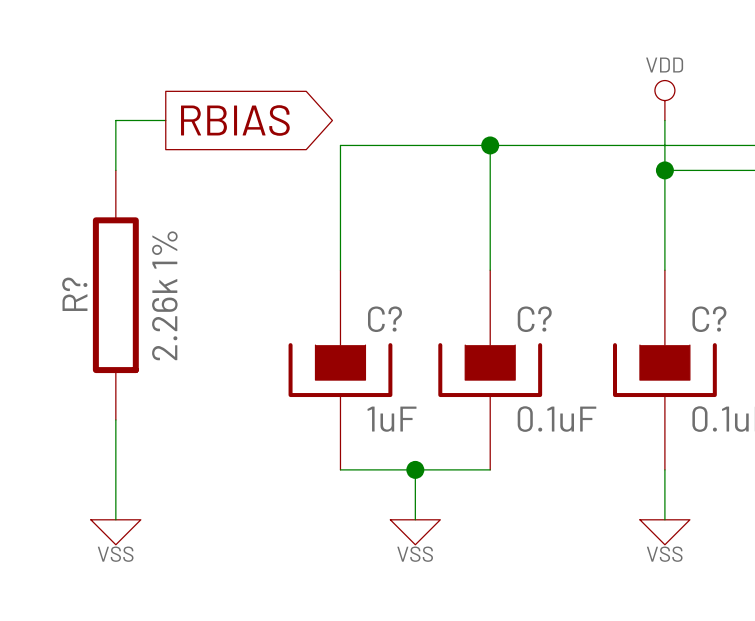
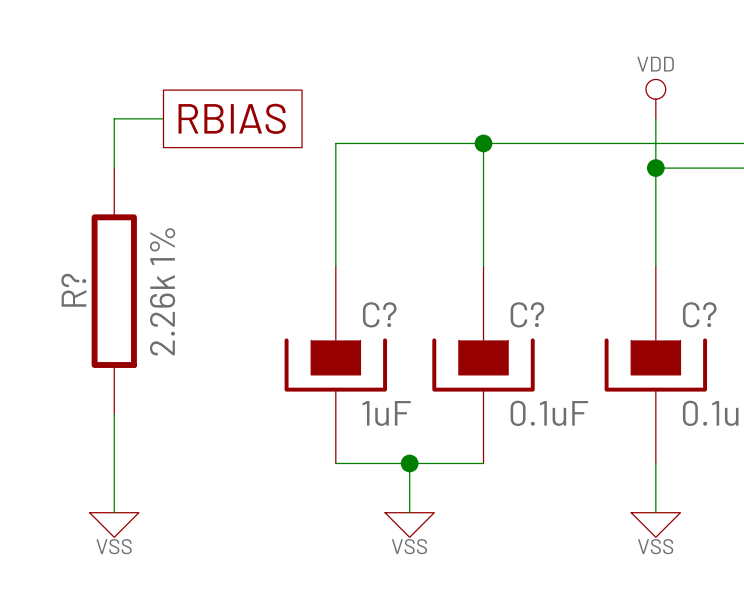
global label shape: output (235, 120) -> passive (232, 118)

